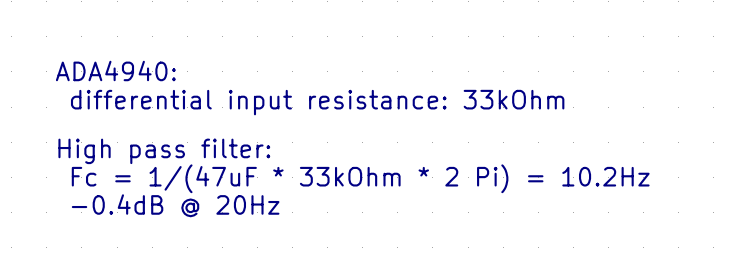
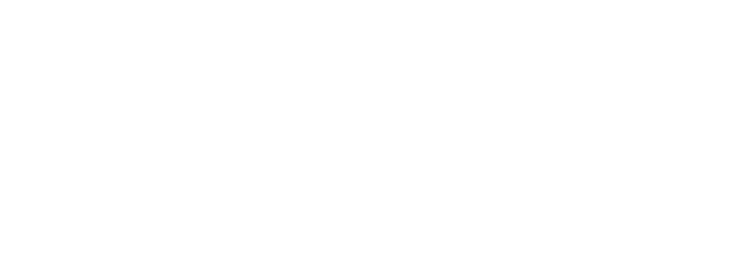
text: ADA4940: (115, 70) -> none
text: differential input resistance: 33kOhm (317, 102) -> none
text: High pass filter: (164, 151) -> none
text: Fc = 1/(47uF * 33kOhm * 2 Pi) = 10.2Hz (360, 178) -> none
text: -0.4dB @ 20Hz (175, 205) -> none

